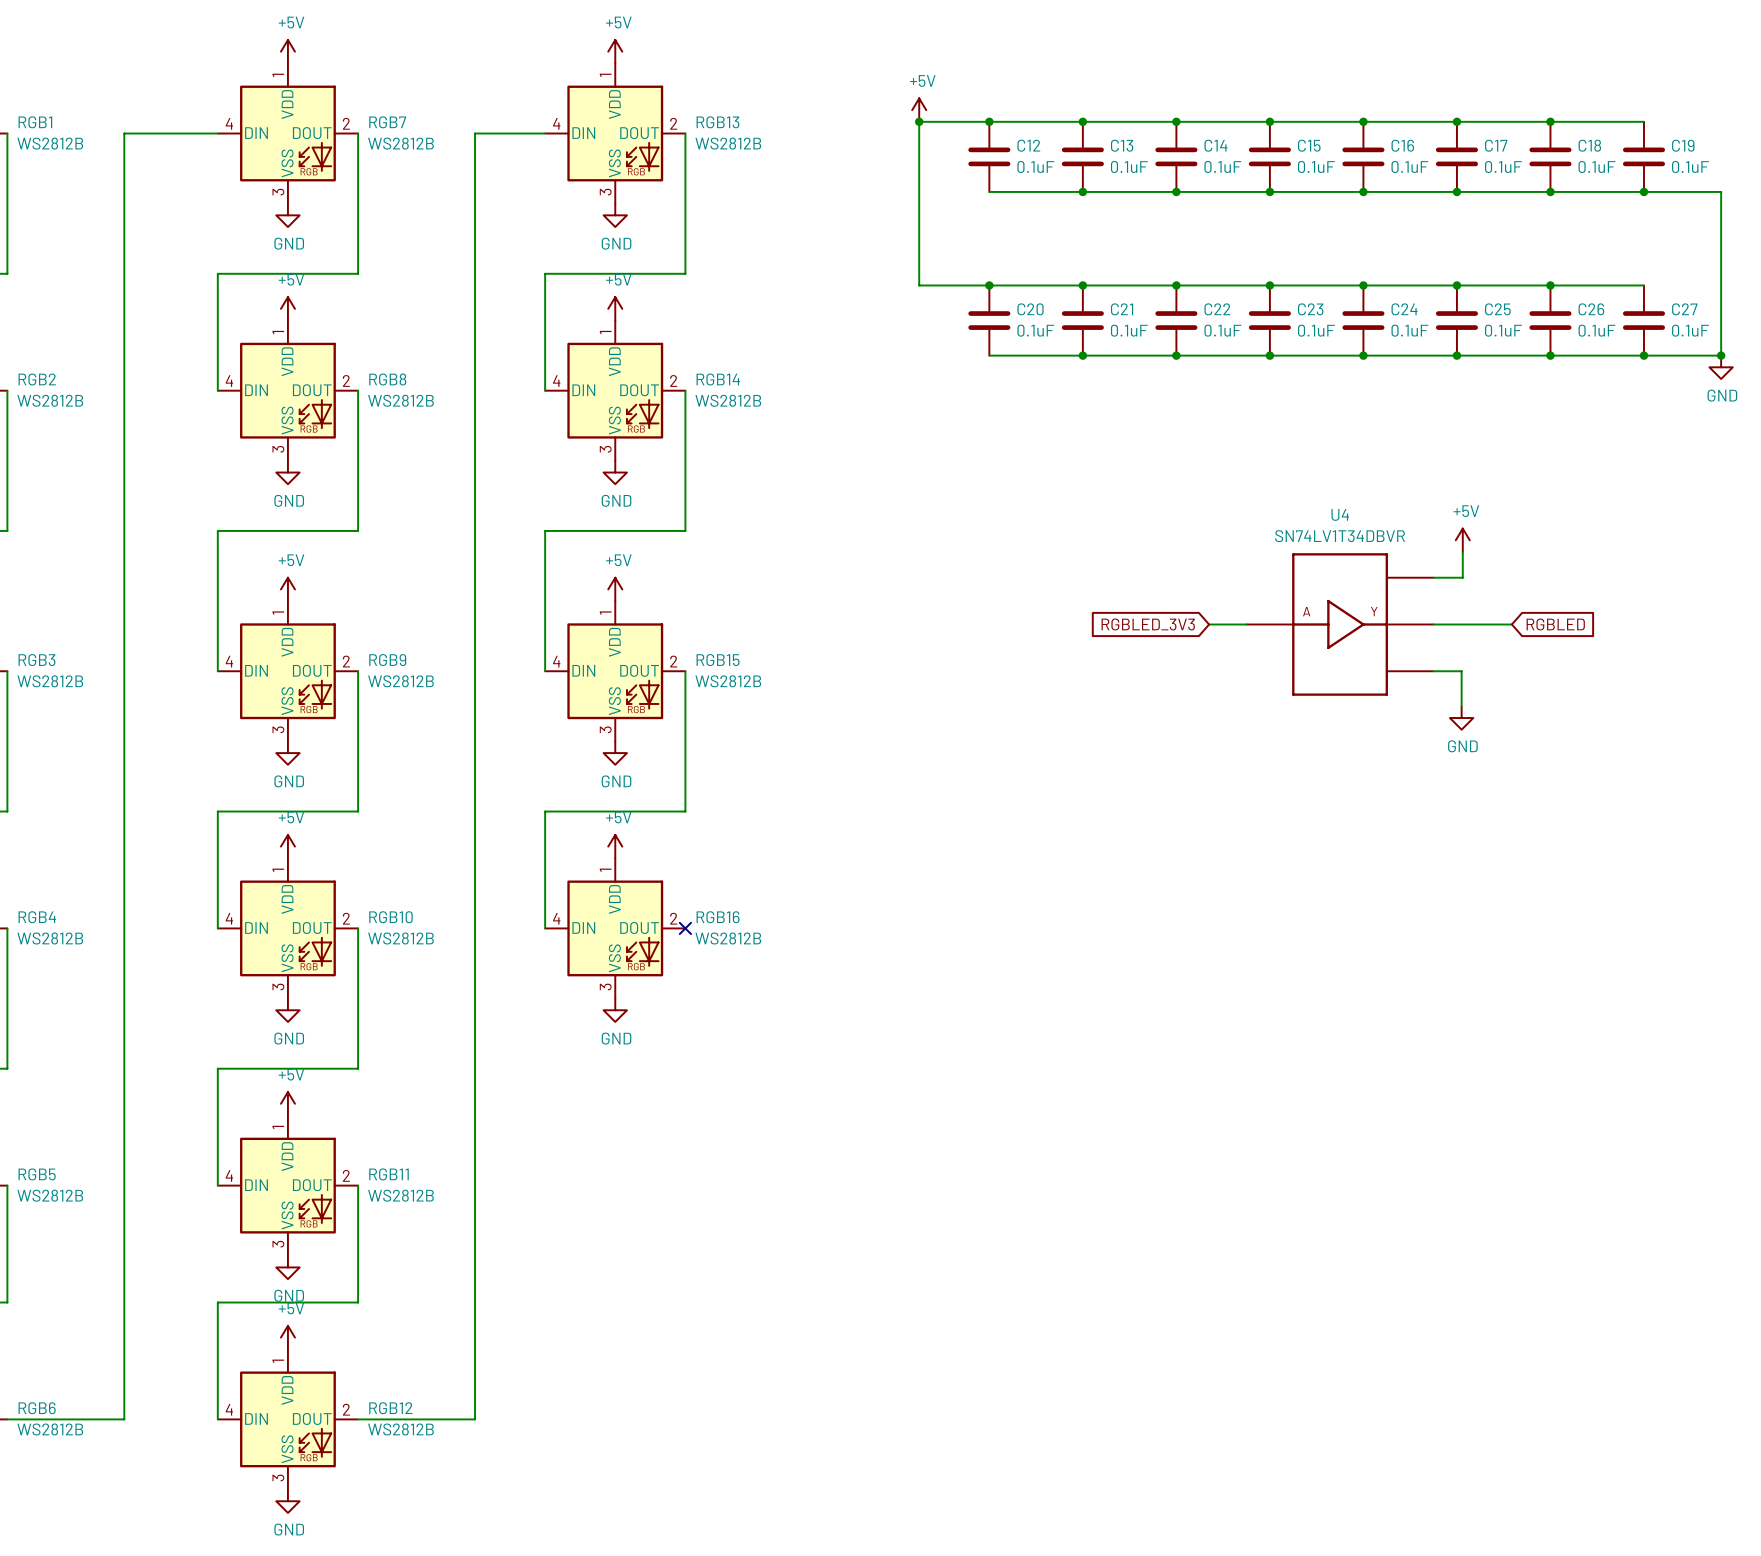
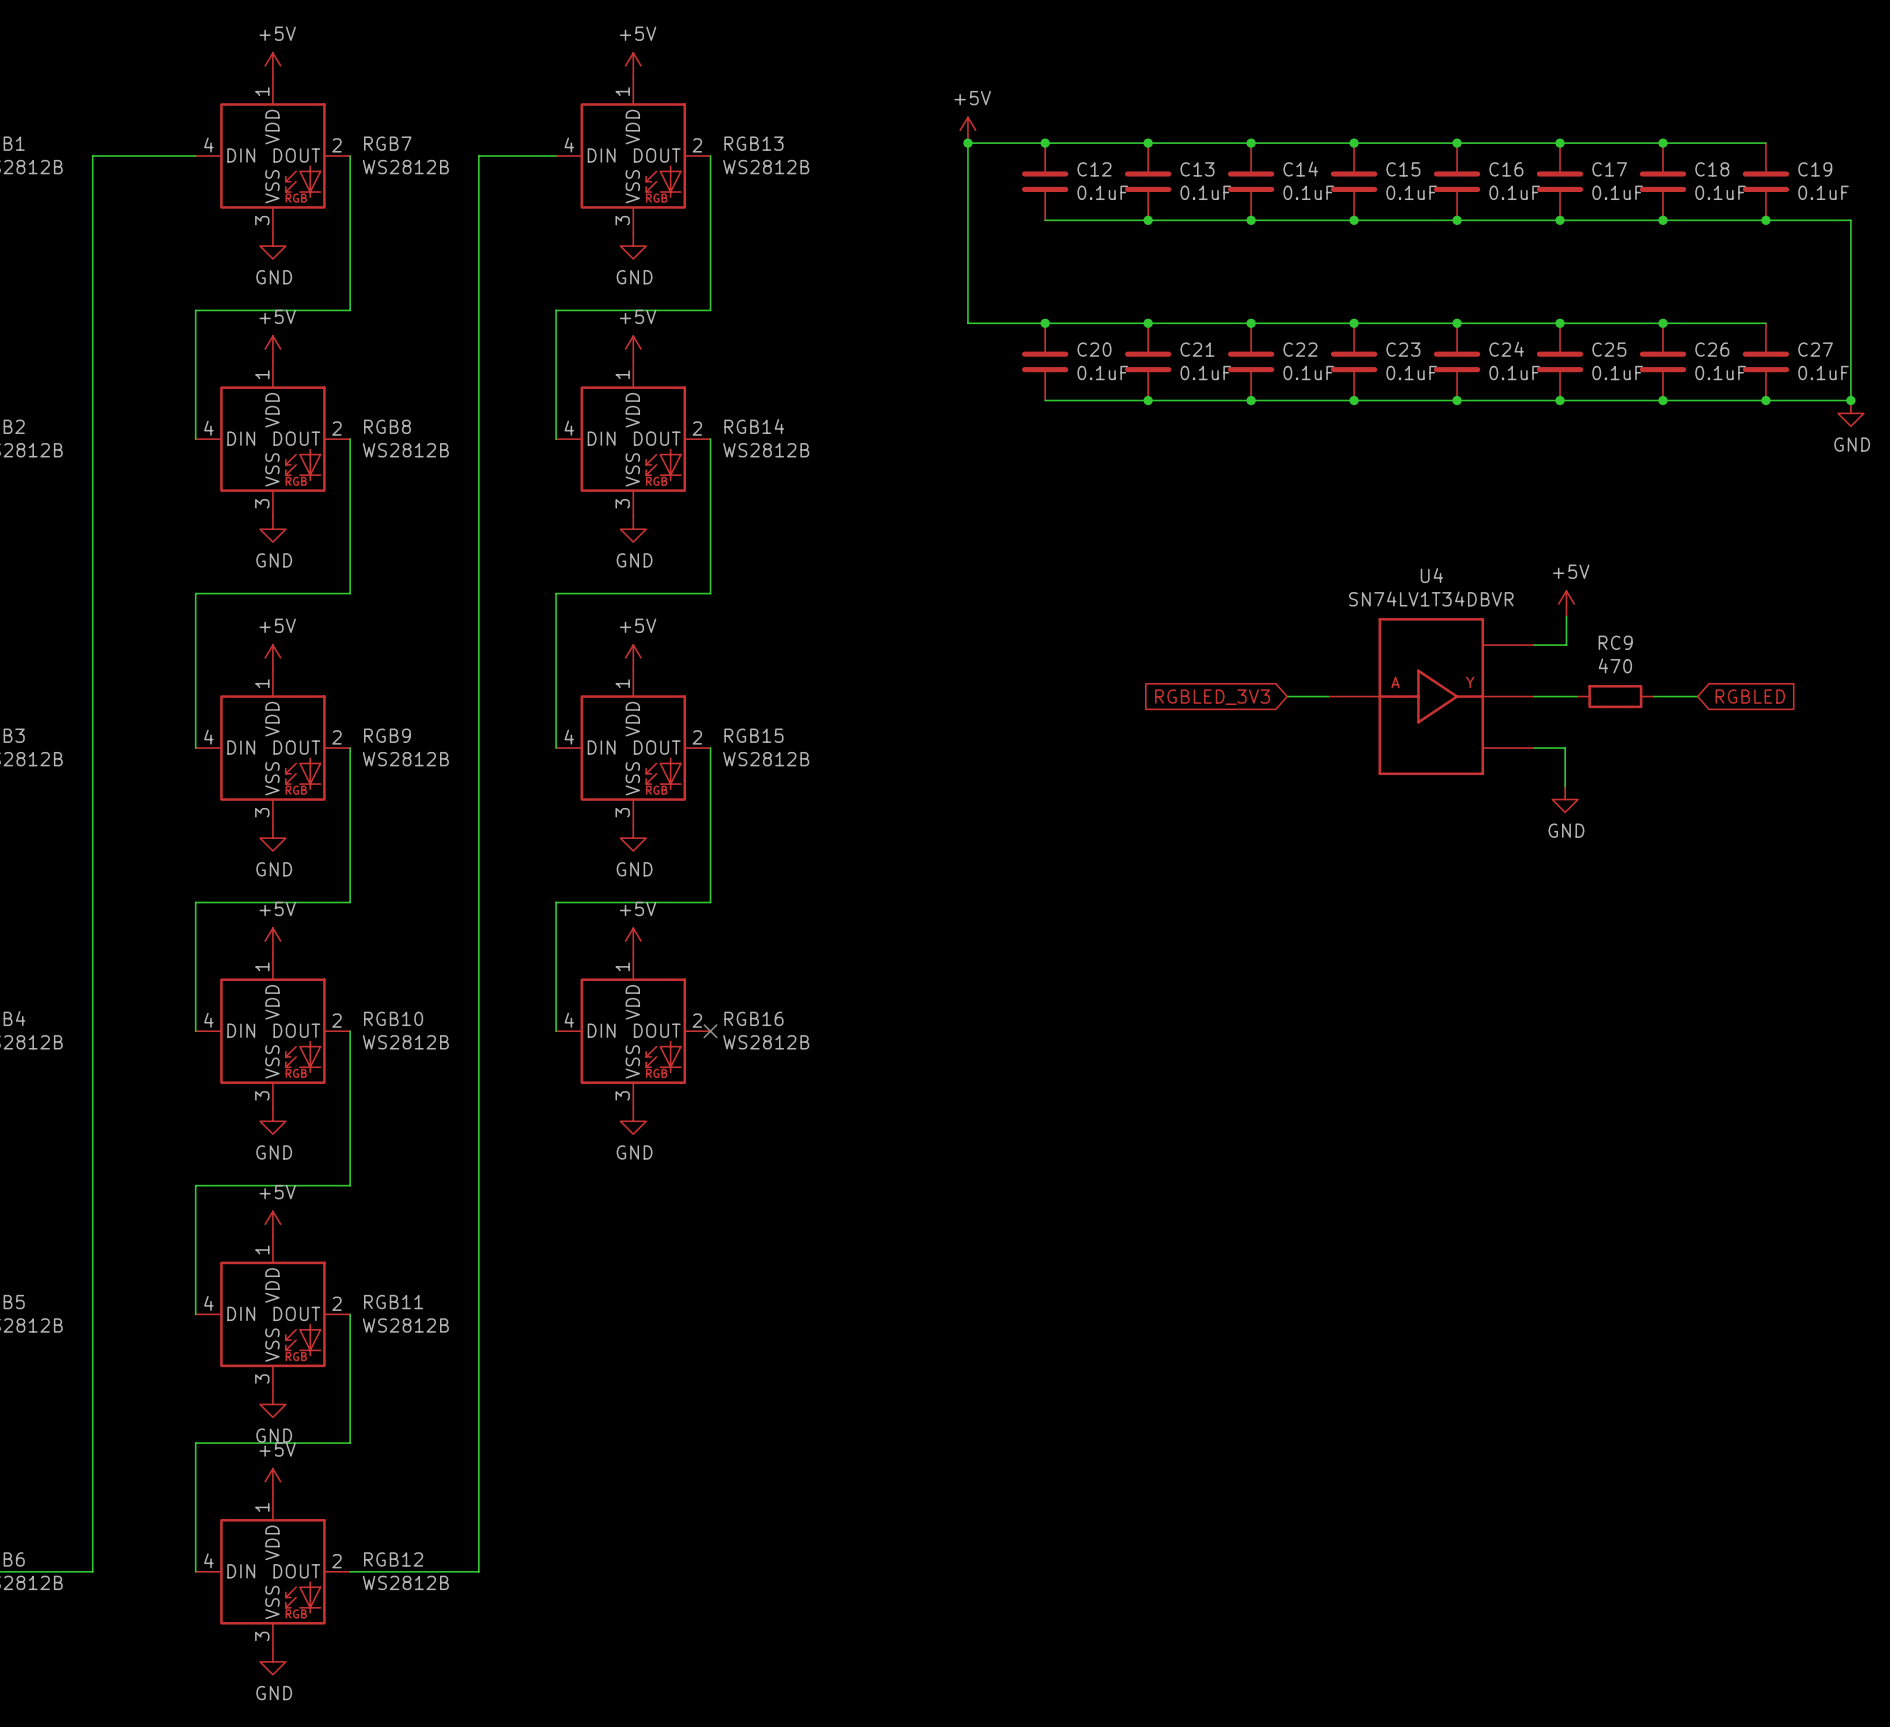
wire: (1472, 624) (1511, 624) -> (1653, 696) (1697, 696)
RC9: none -> 470 (1615, 696)
global label position: RGBLED (1555, 624) -> RGBLED (1750, 696)

